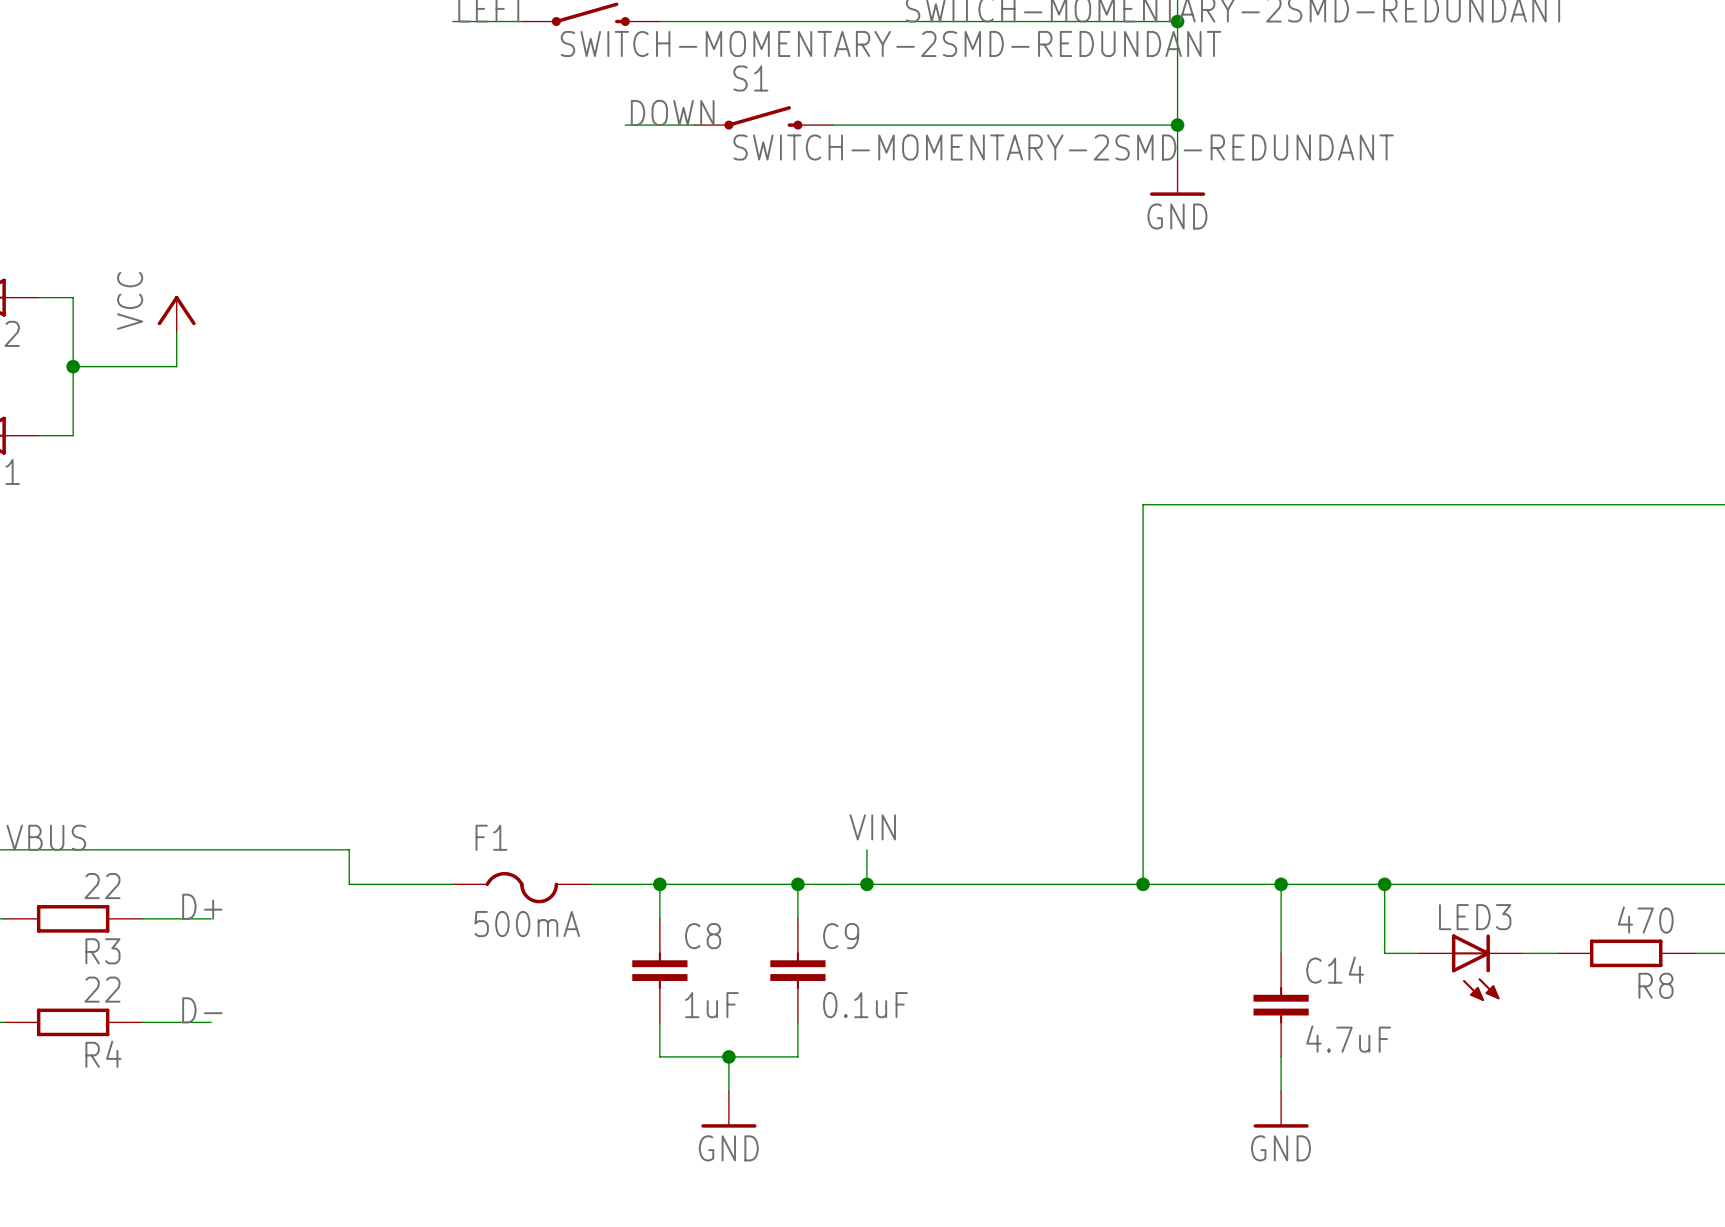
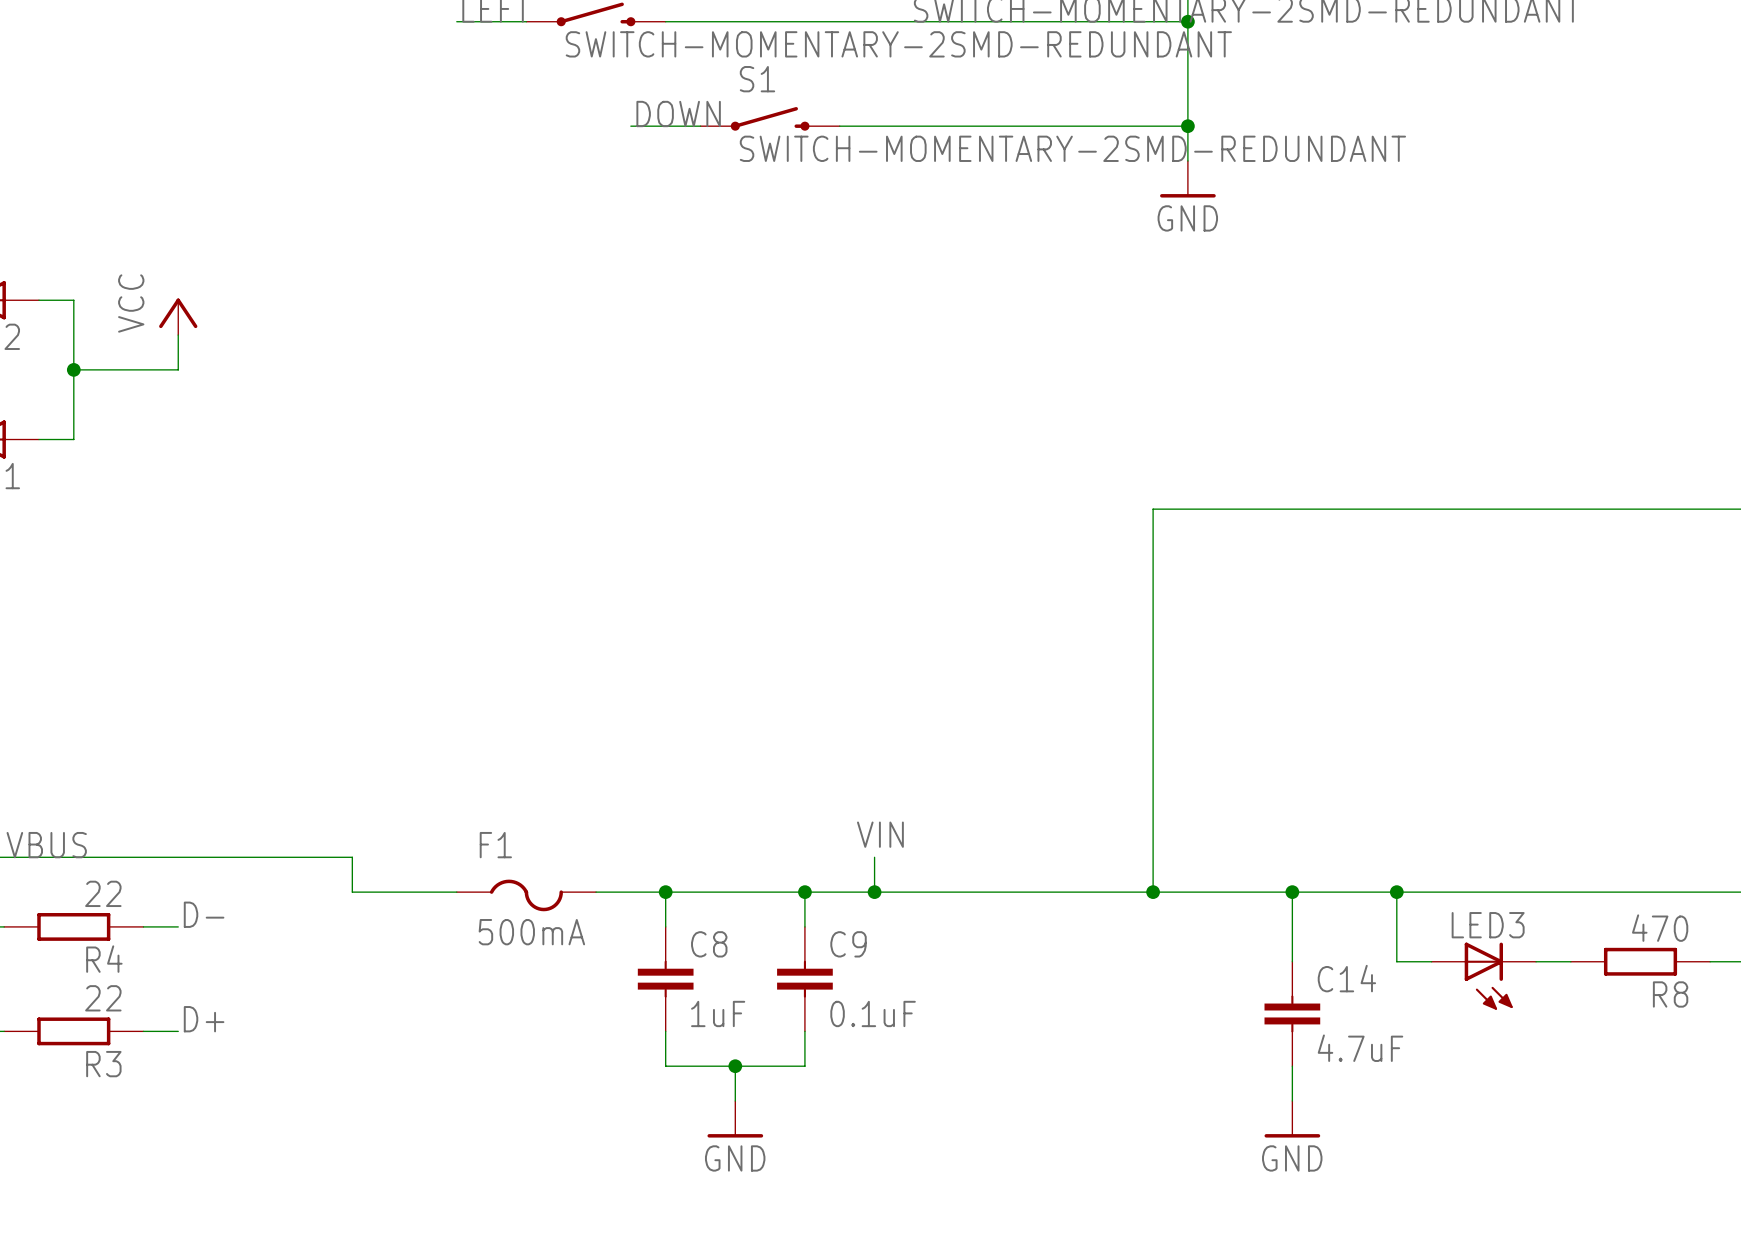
label: D+ (202, 906) -> D- (204, 914)
wire: (176, 918) (211, 918) -> none
R3 name: R3 (102, 951) -> R4 (104, 959)
label: D- (202, 1010) -> D+ (204, 1019)
wire: (176, 1022) (211, 1022) -> none
R4 name: R4 (103, 1054) -> R3 (103, 1064)

